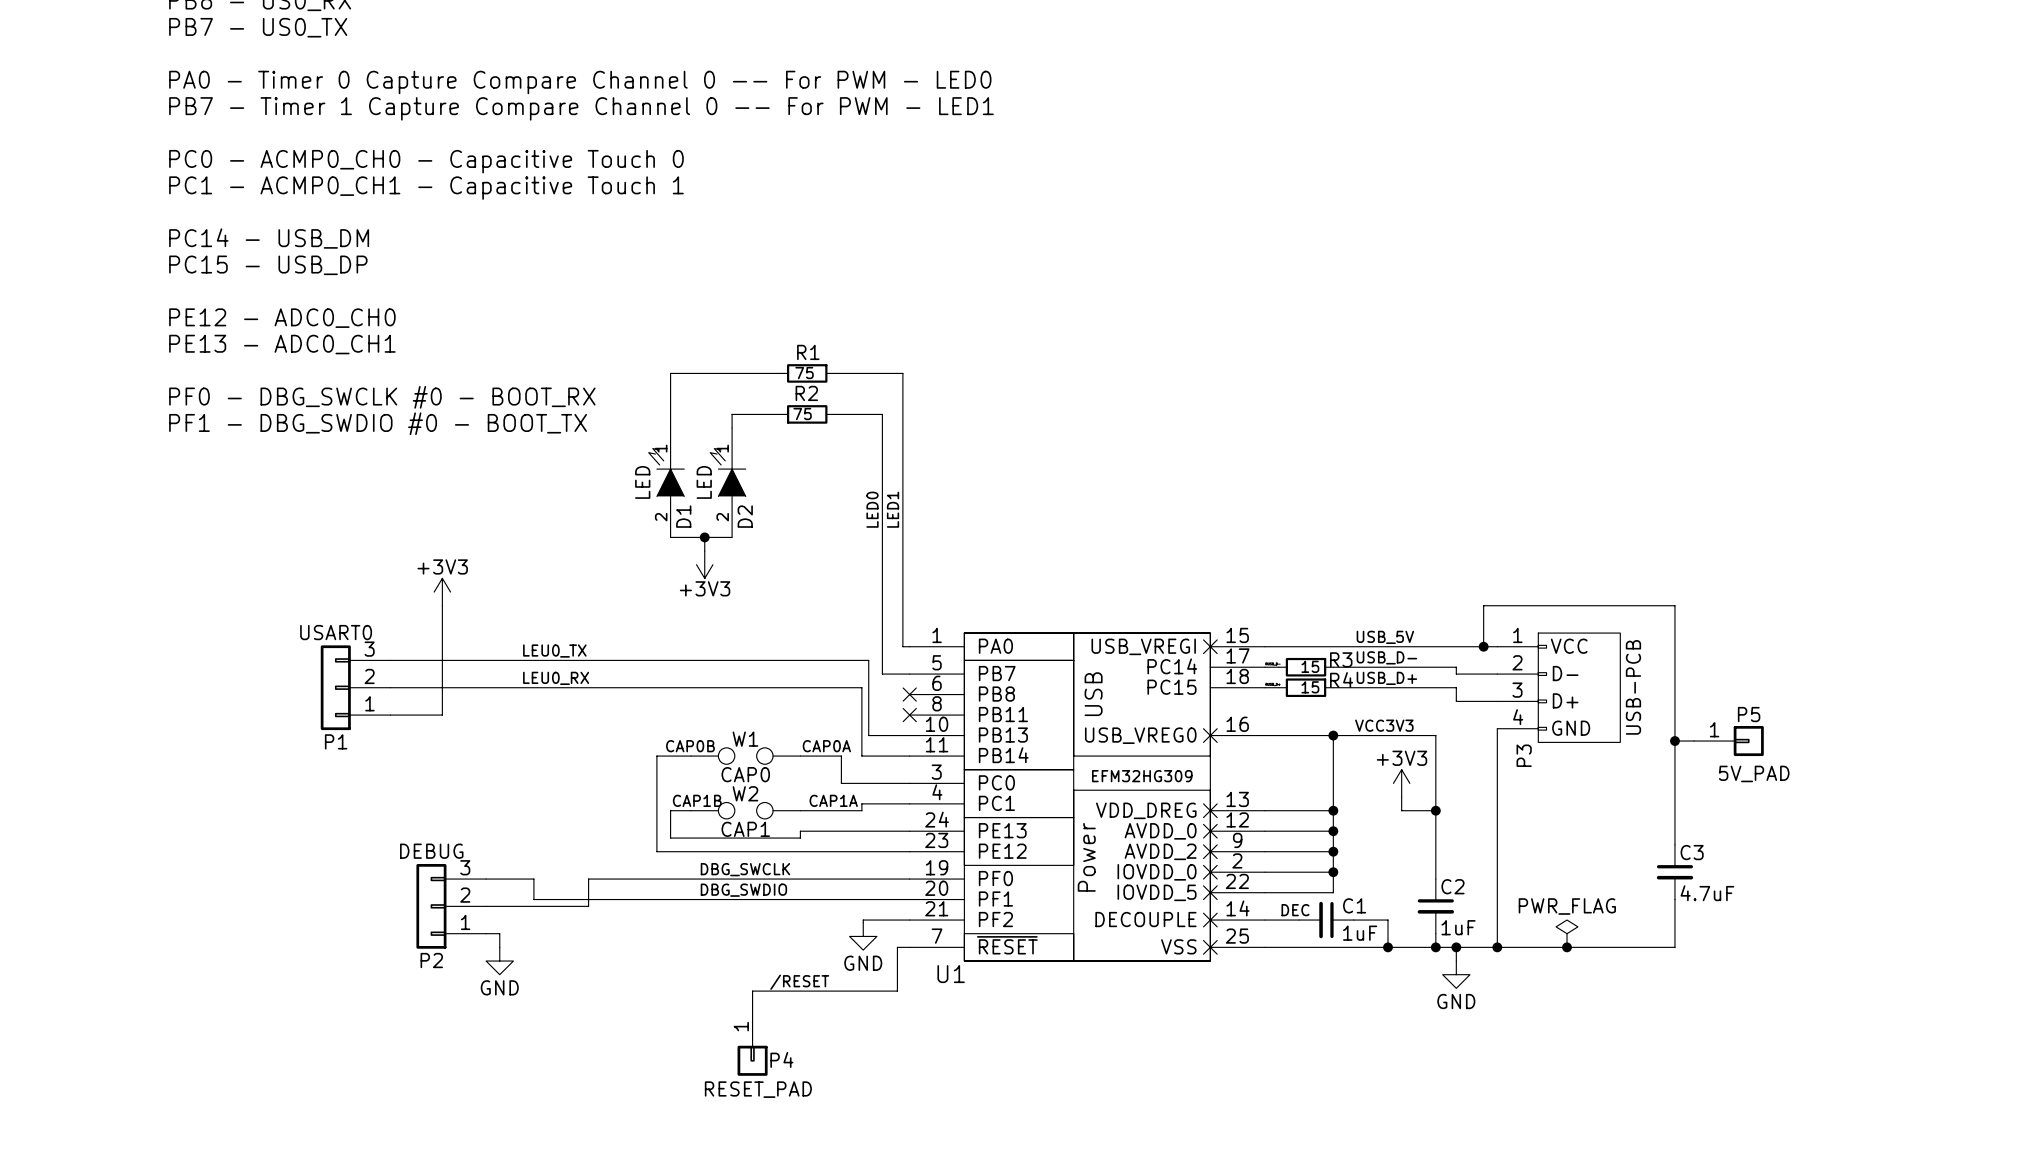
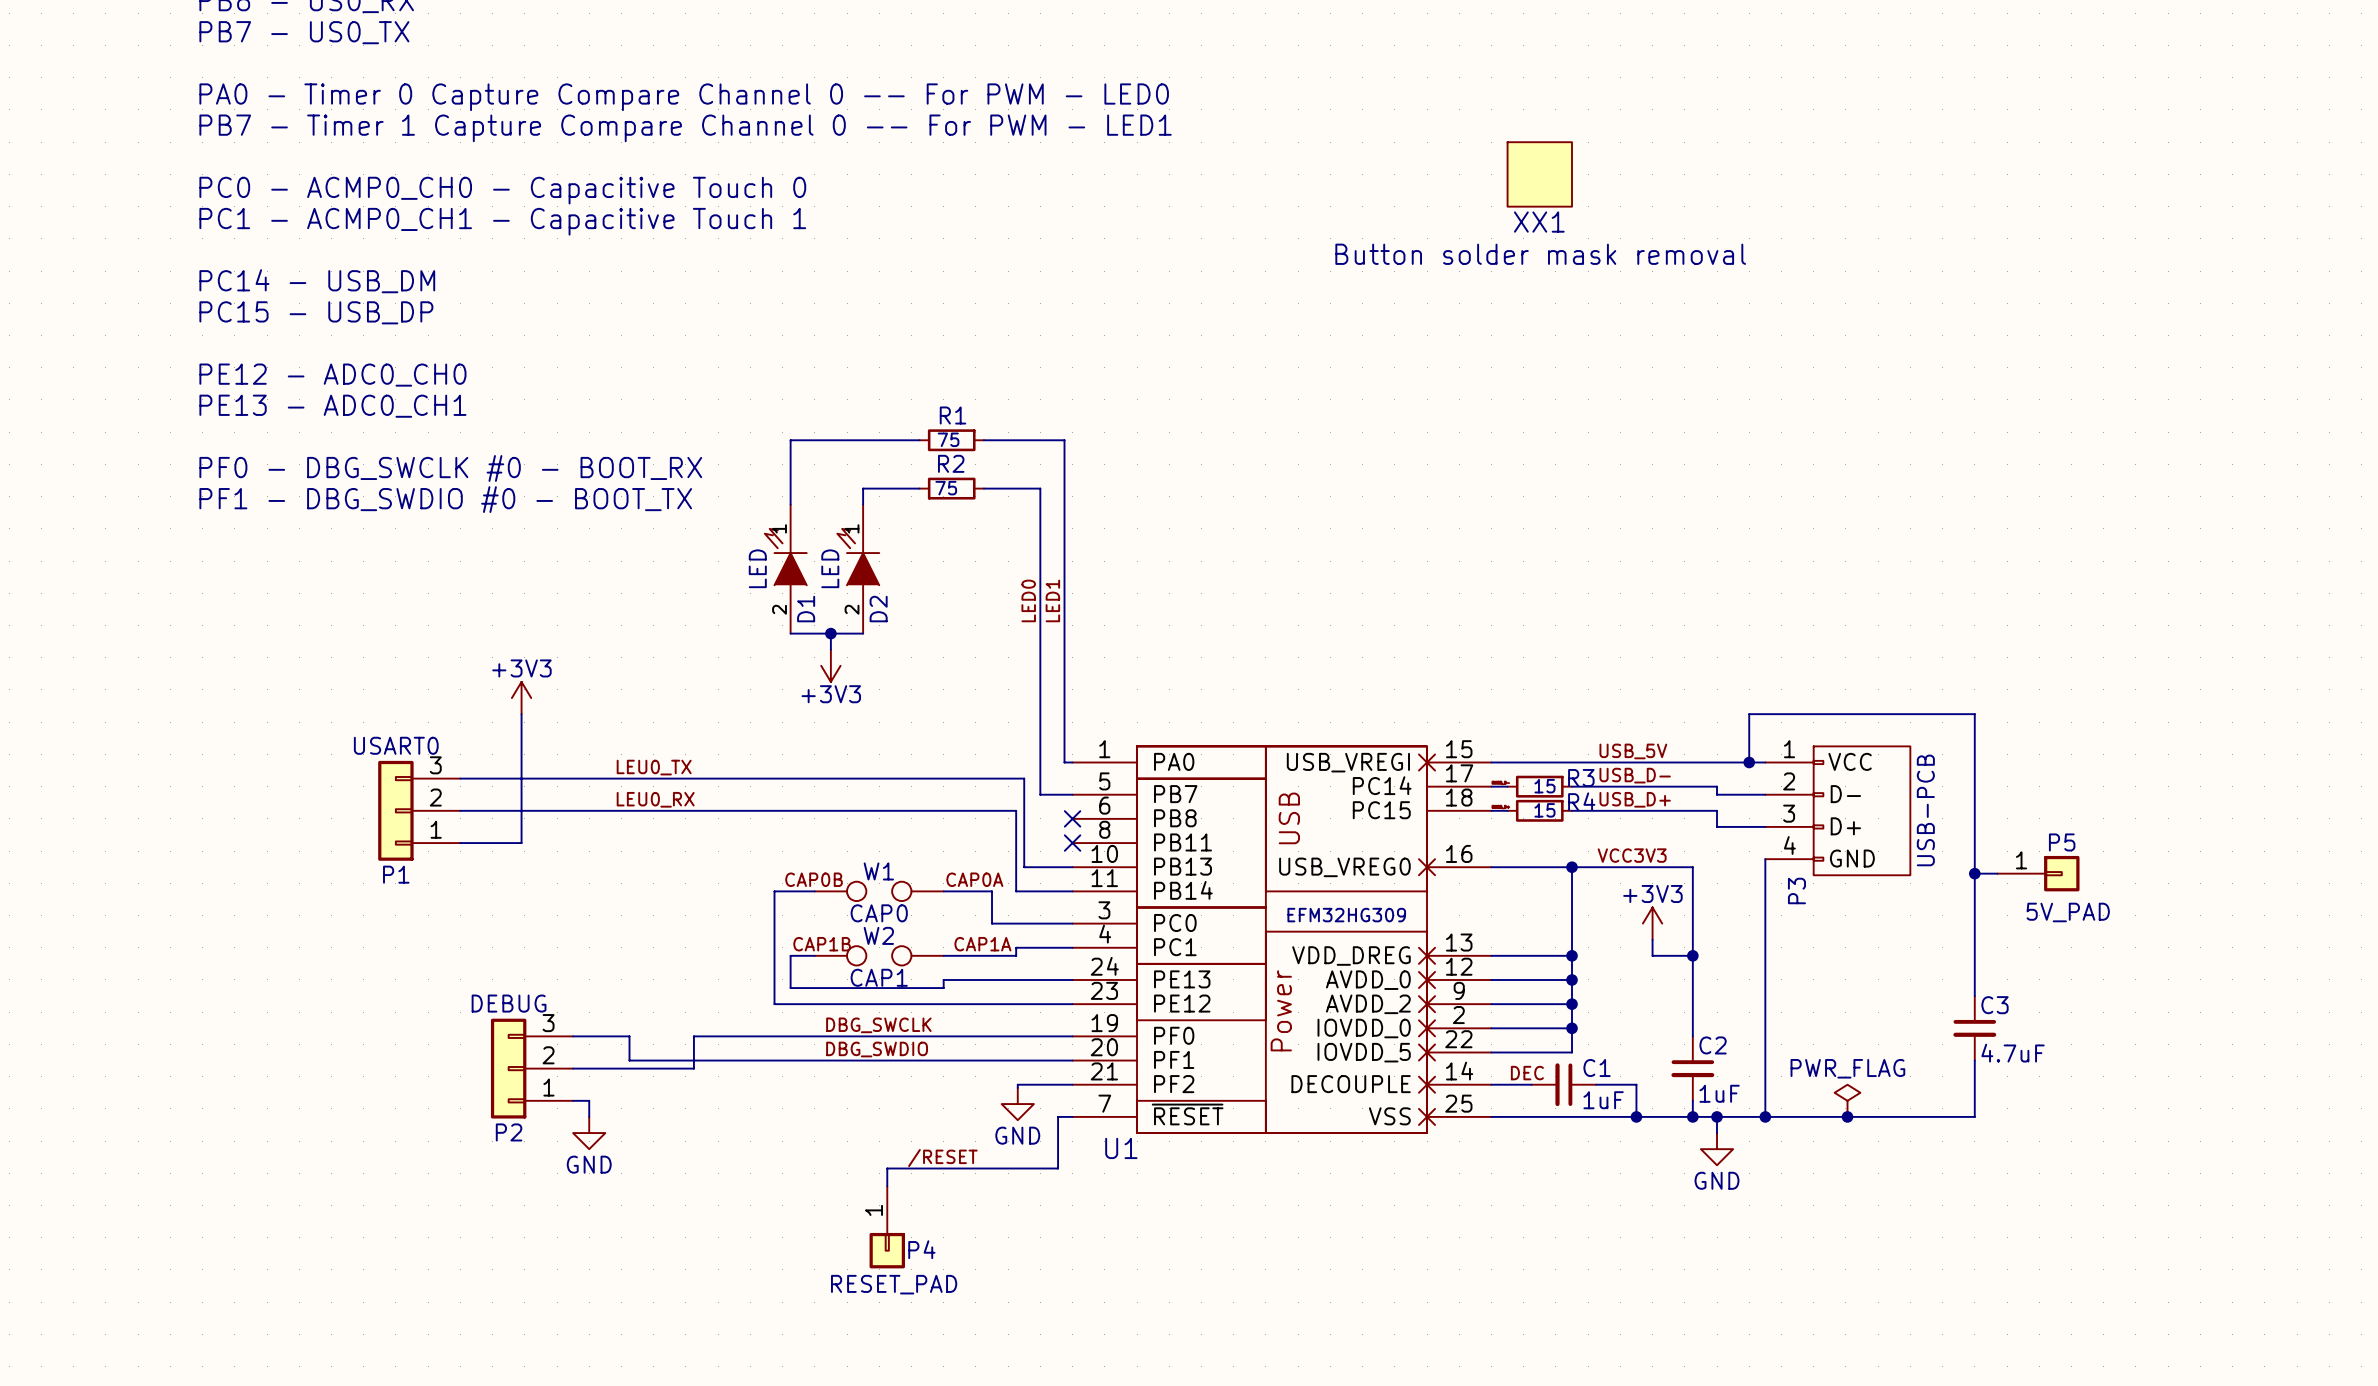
XX1: none -> Button solder mask removal (1539, 174)

